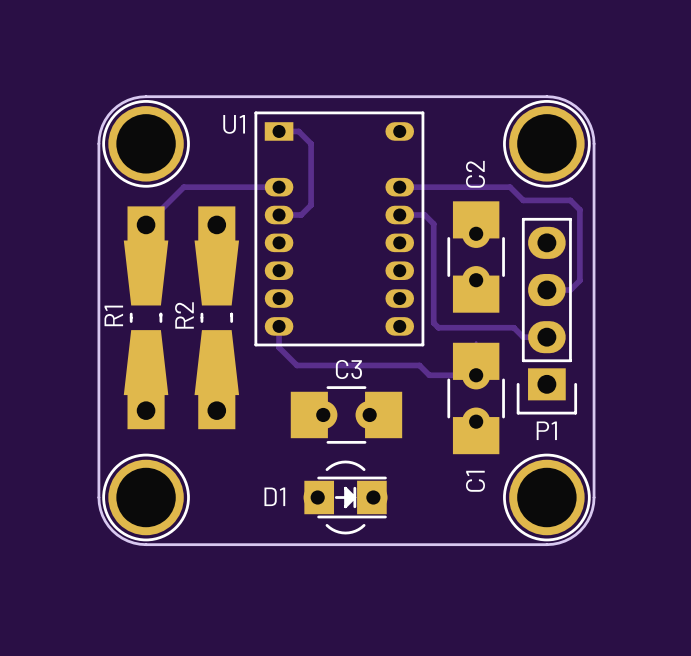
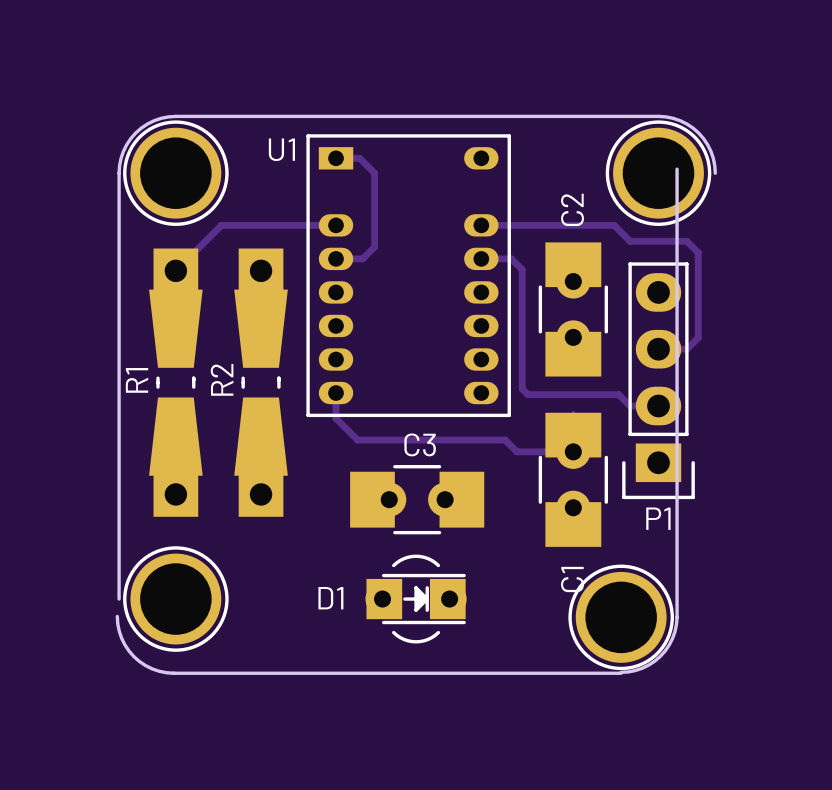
board edge: none -> (677, 169) (676, 624) (669, 644) (660, 656) (642, 668) (621, 672)
board edge: (594, 143) (594, 497) (592, 509) (587, 521) (575, 534) (564, 541) (546, 544) (139, 544) (122, 538) (108, 526) (100, 509) (98, 497) -> none
part position: (546, 497) -> (621, 617)
board edge: none -> (117, 616) (121, 638) (133, 656) (152, 668) (166, 672) (621, 673)

